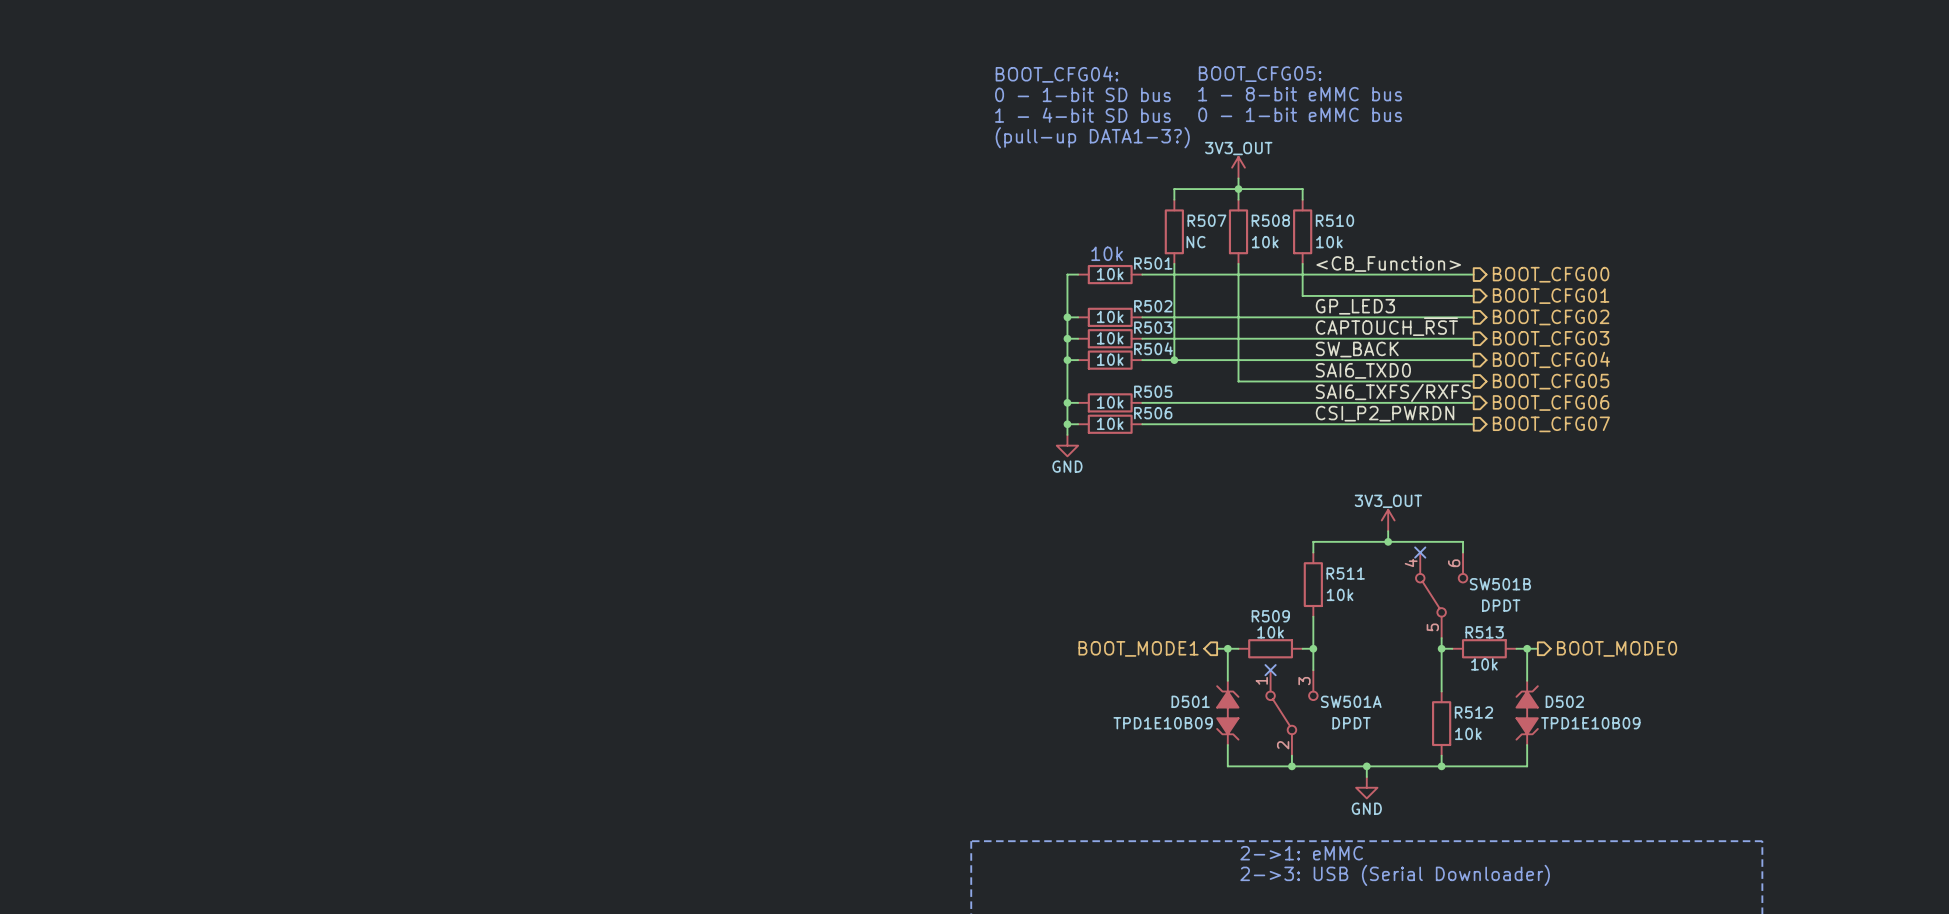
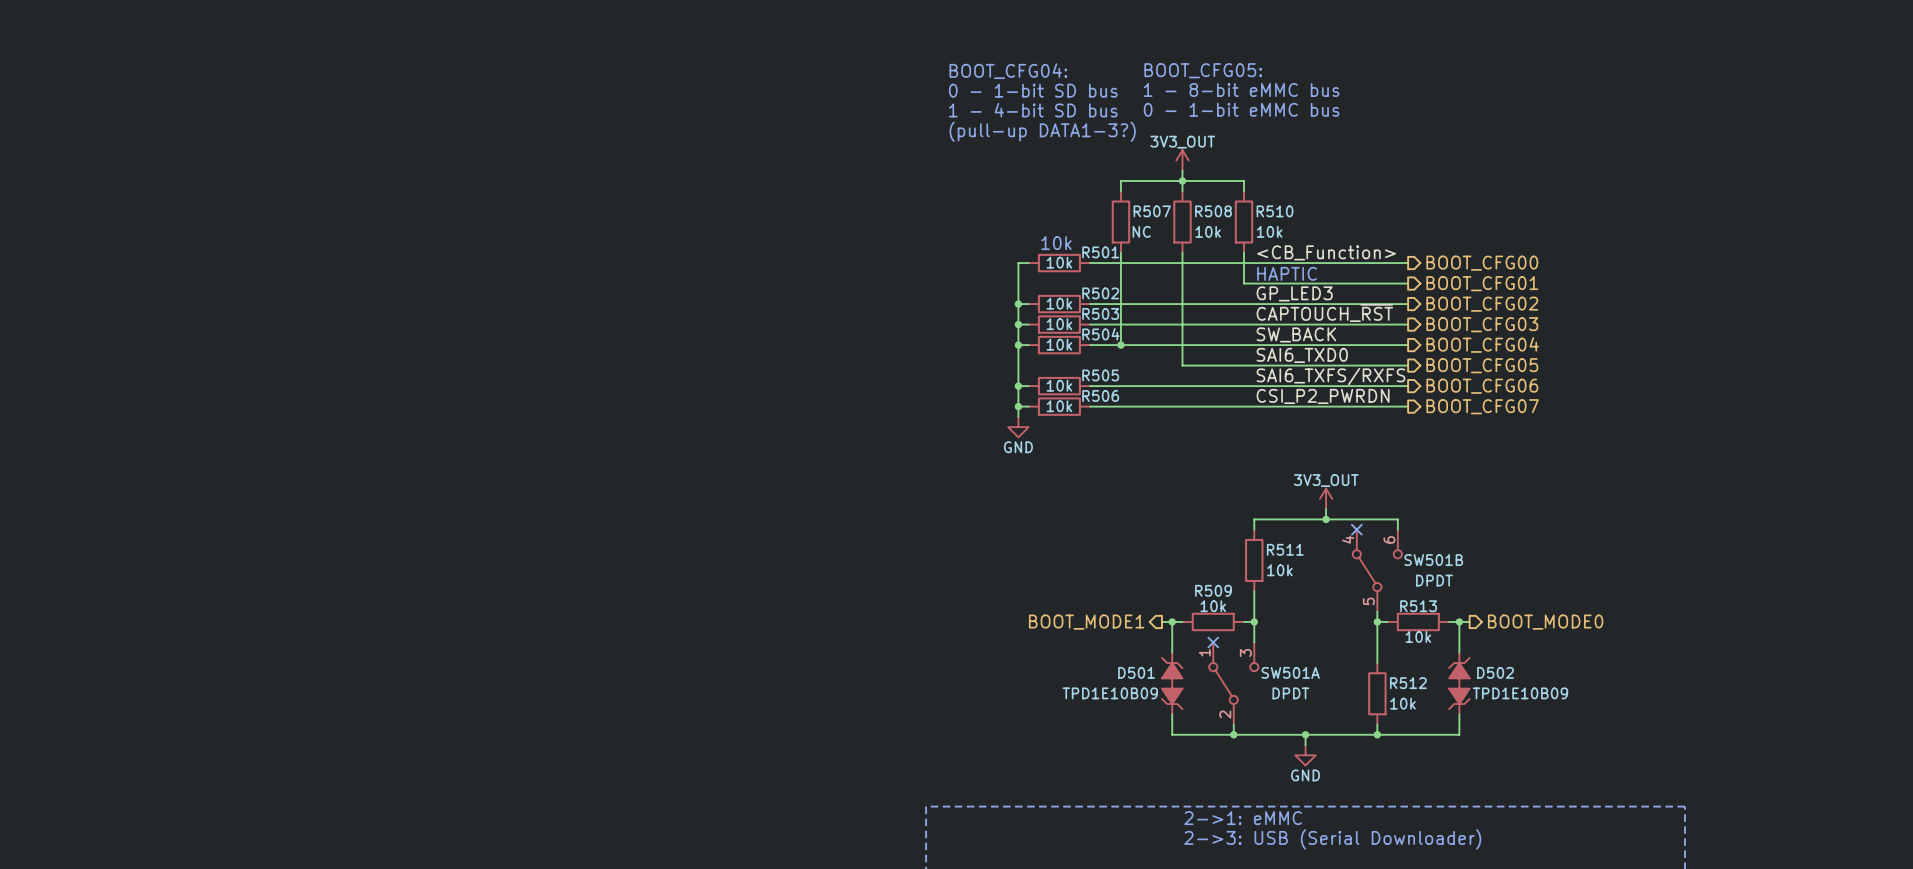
text: none -> HAPTIC (1287, 273)

